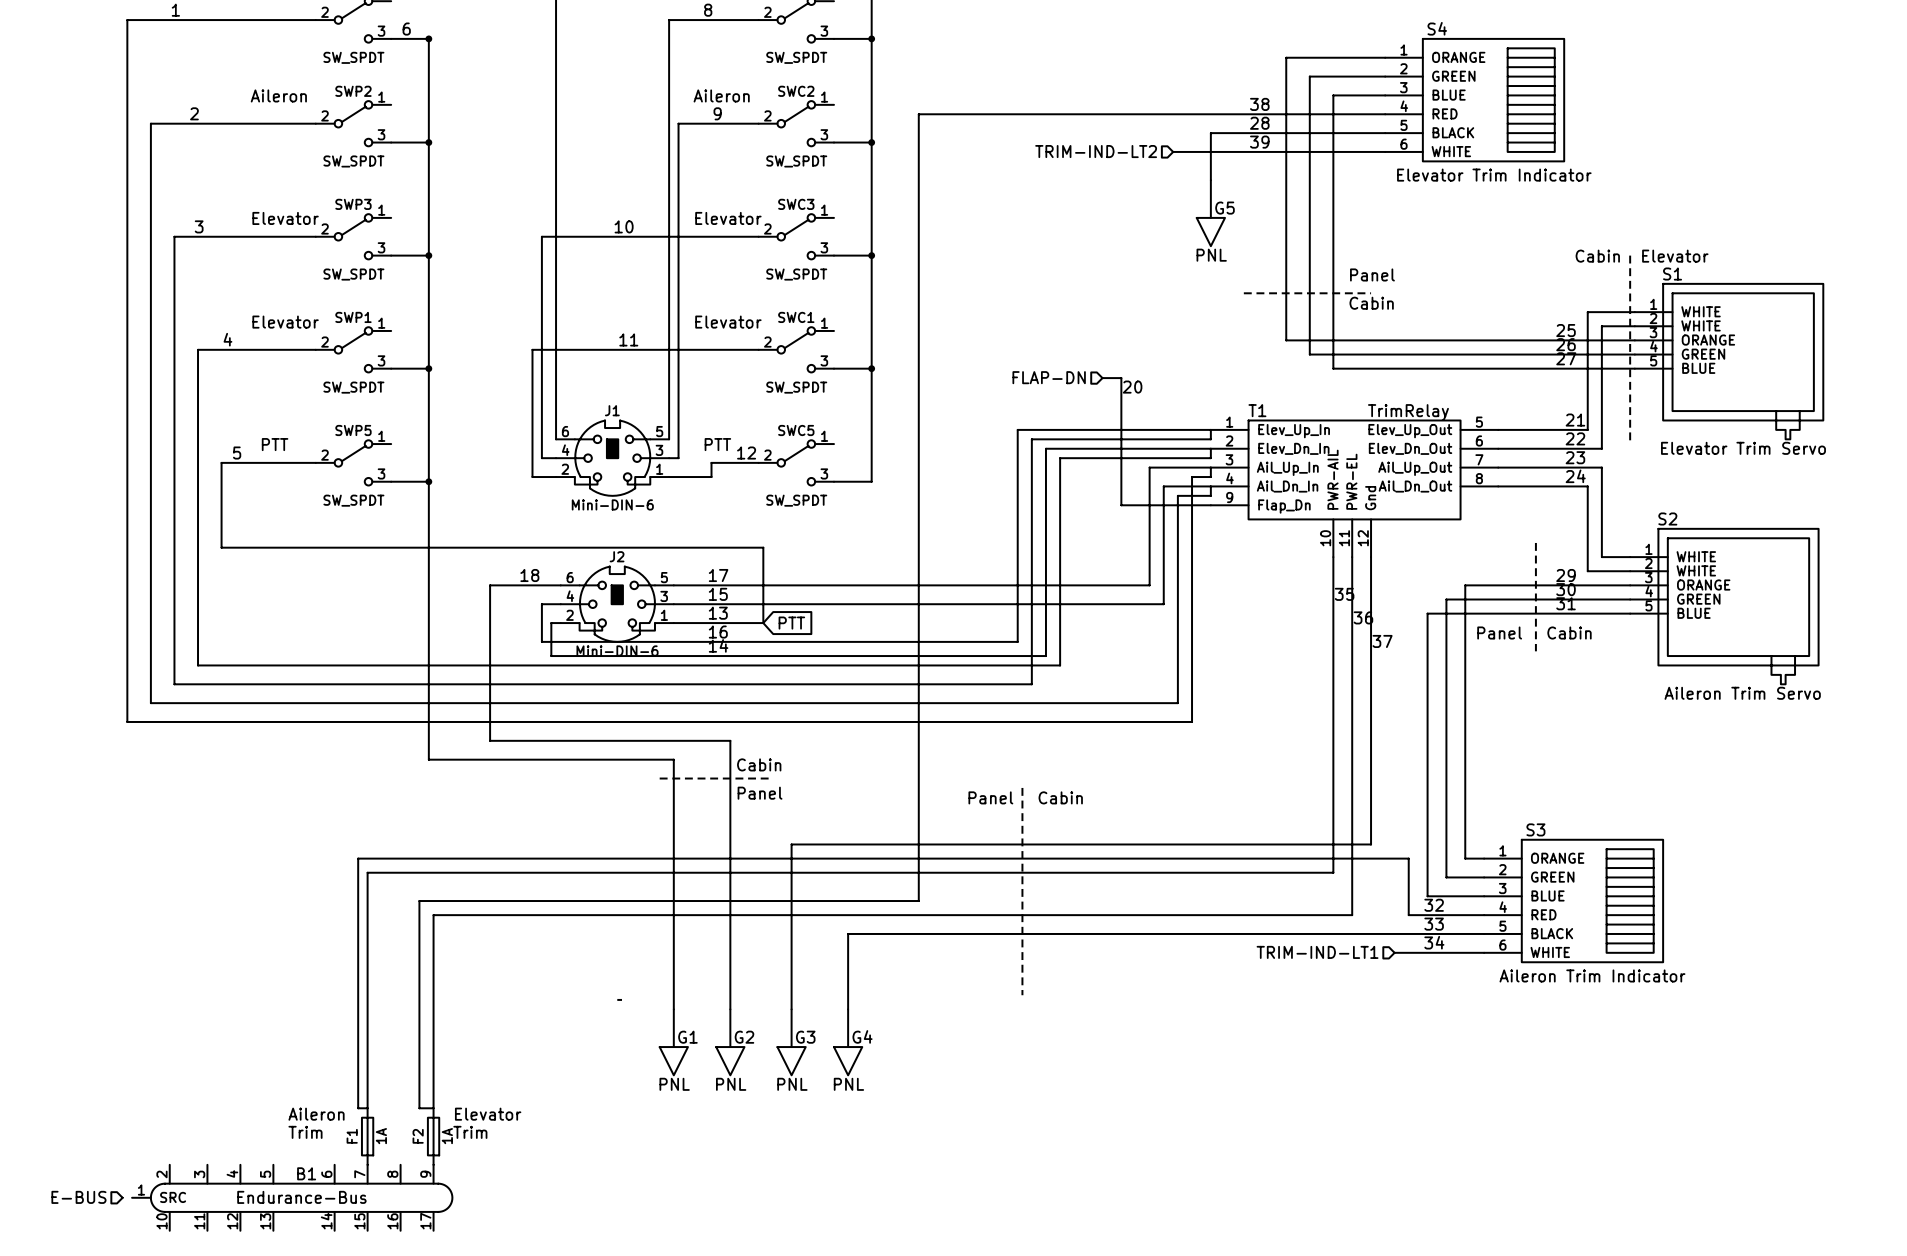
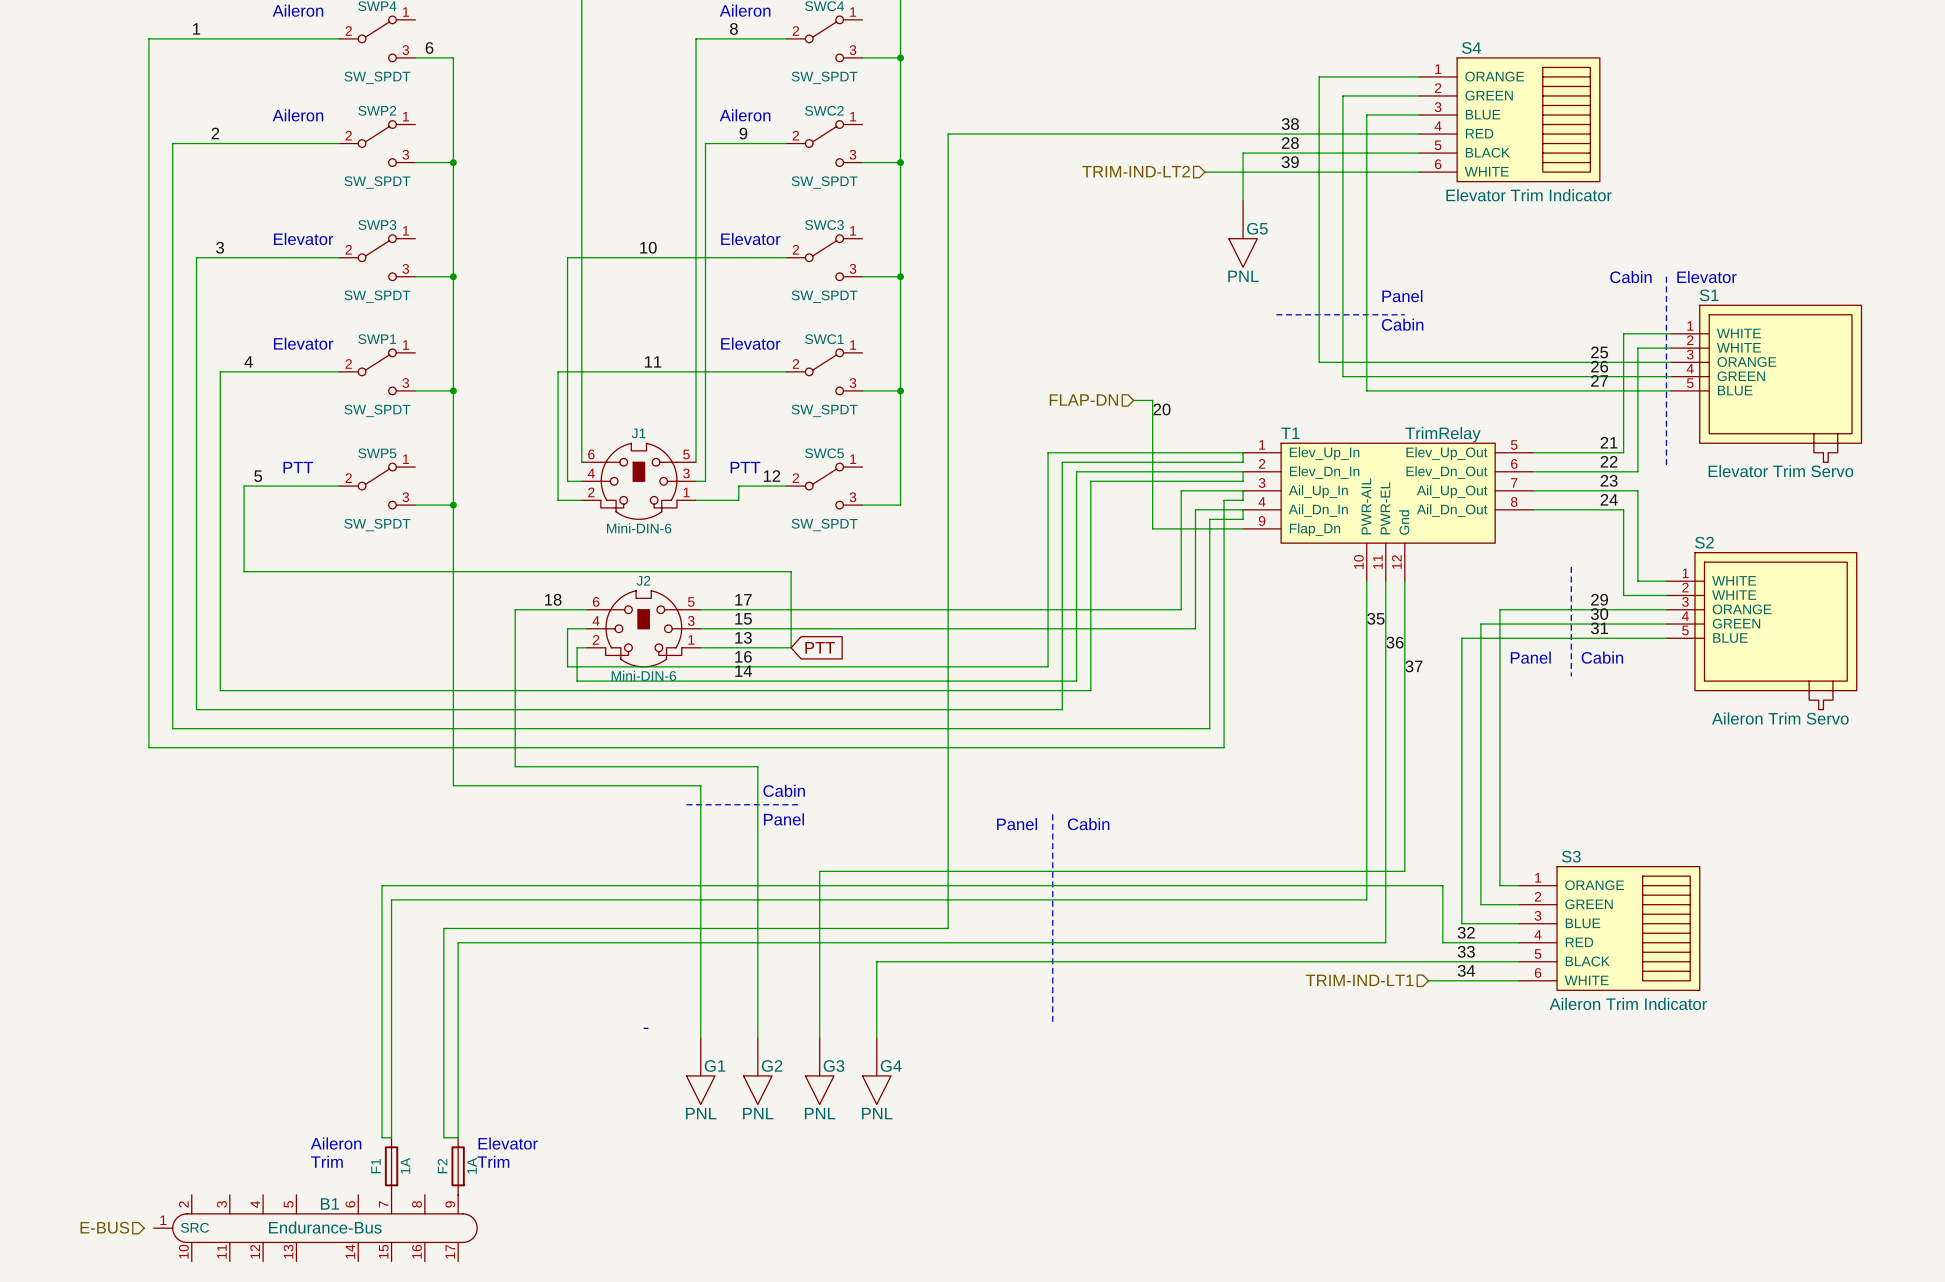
junction: (428, 38) -> none

